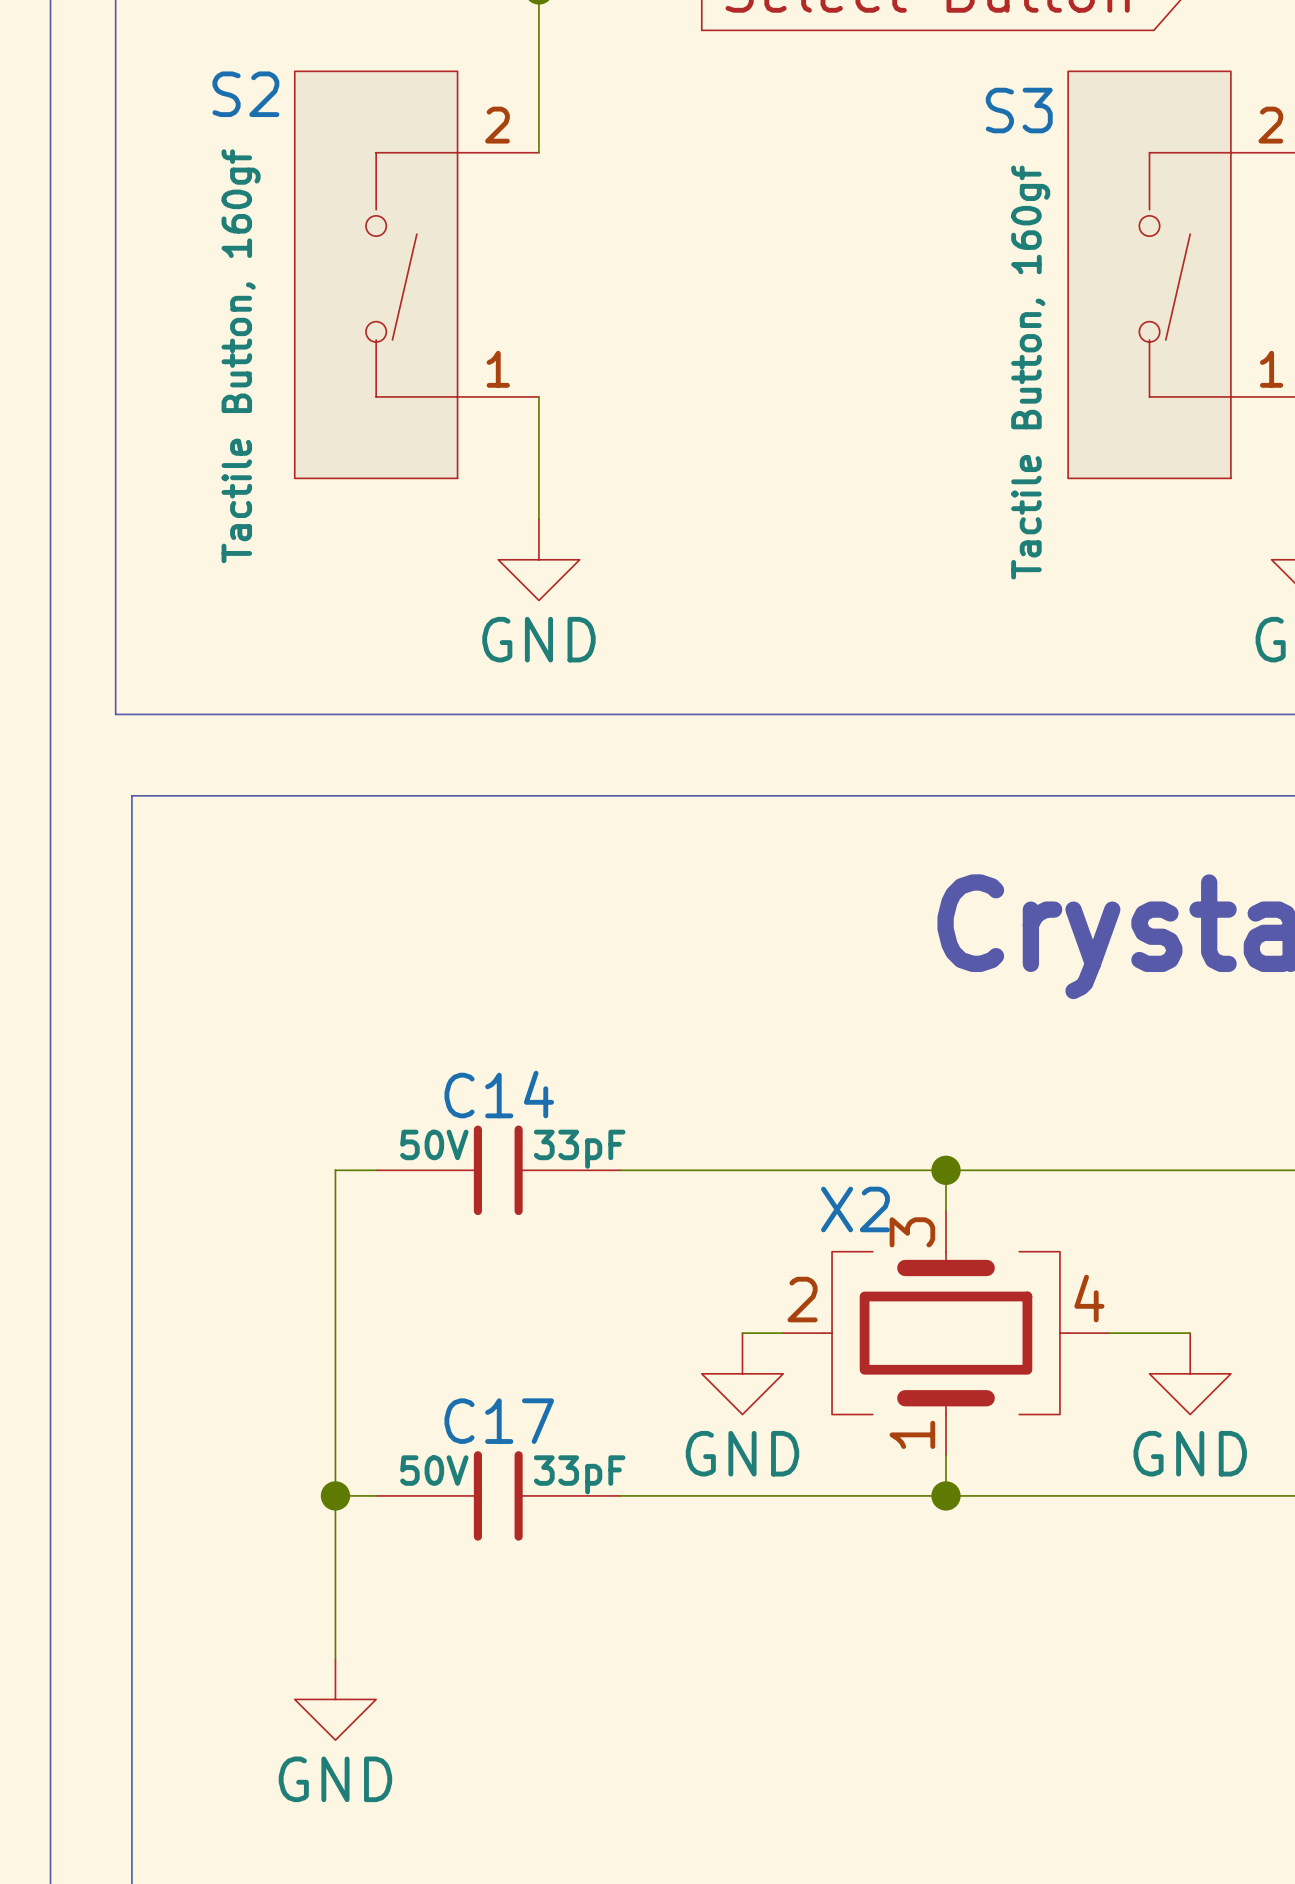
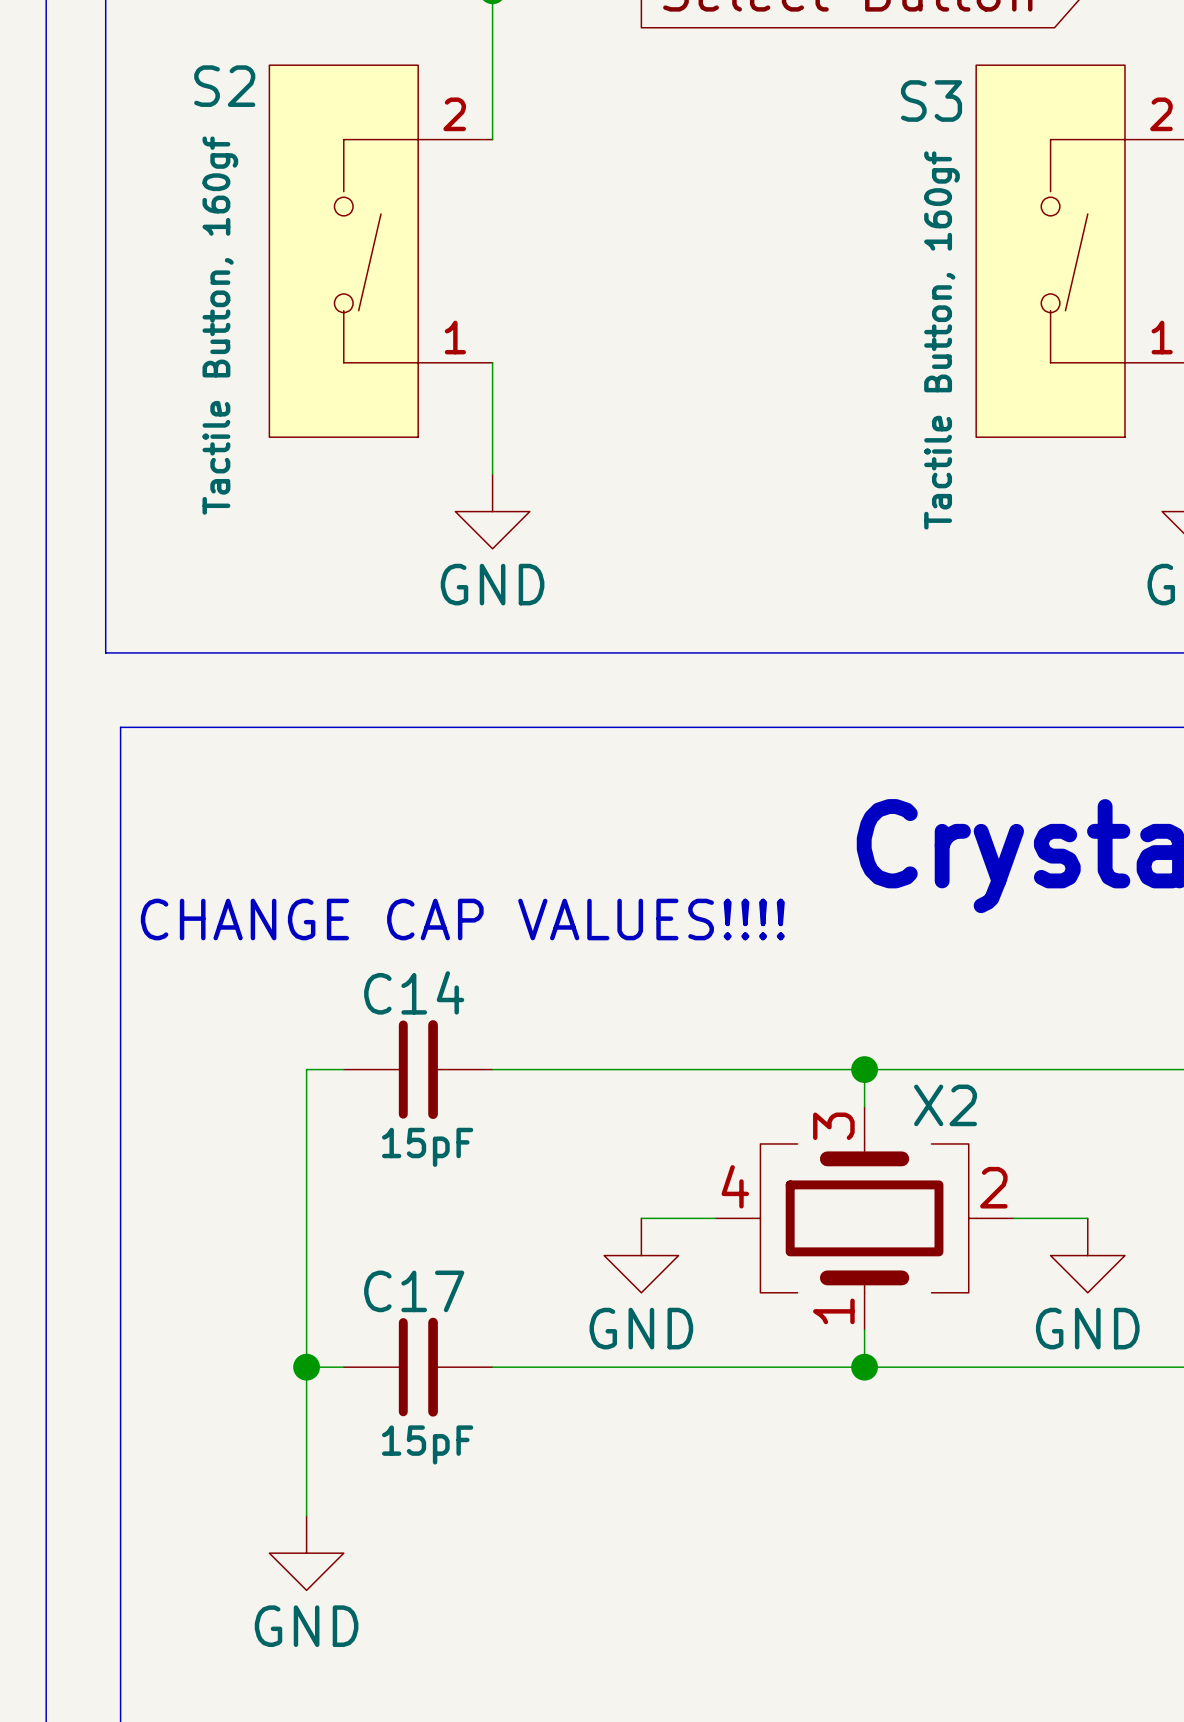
text: none -> CHANGE CAP VALUES!!!! (462, 919)
C14 symbol: [376, 1125, 621, 1216] -> [343, 1020, 493, 1120]
C14 text: 50V (434, 1144) -> none
C14 value: 33pF (579, 1149) -> 15pF (427, 1147)
wire: none -> (641, 1218) (678, 1218)
X2 flip: as is (945, 1333) -> left-right (864, 1218)
power symbol position: GND (742, 1373) -> GND (641, 1255)
C17 symbol: [376, 1451, 621, 1541] -> [343, 1317, 493, 1417]
C17 text: 50V (434, 1470) -> none
C17 value: 33pF (579, 1474) -> 15pF (427, 1444)

